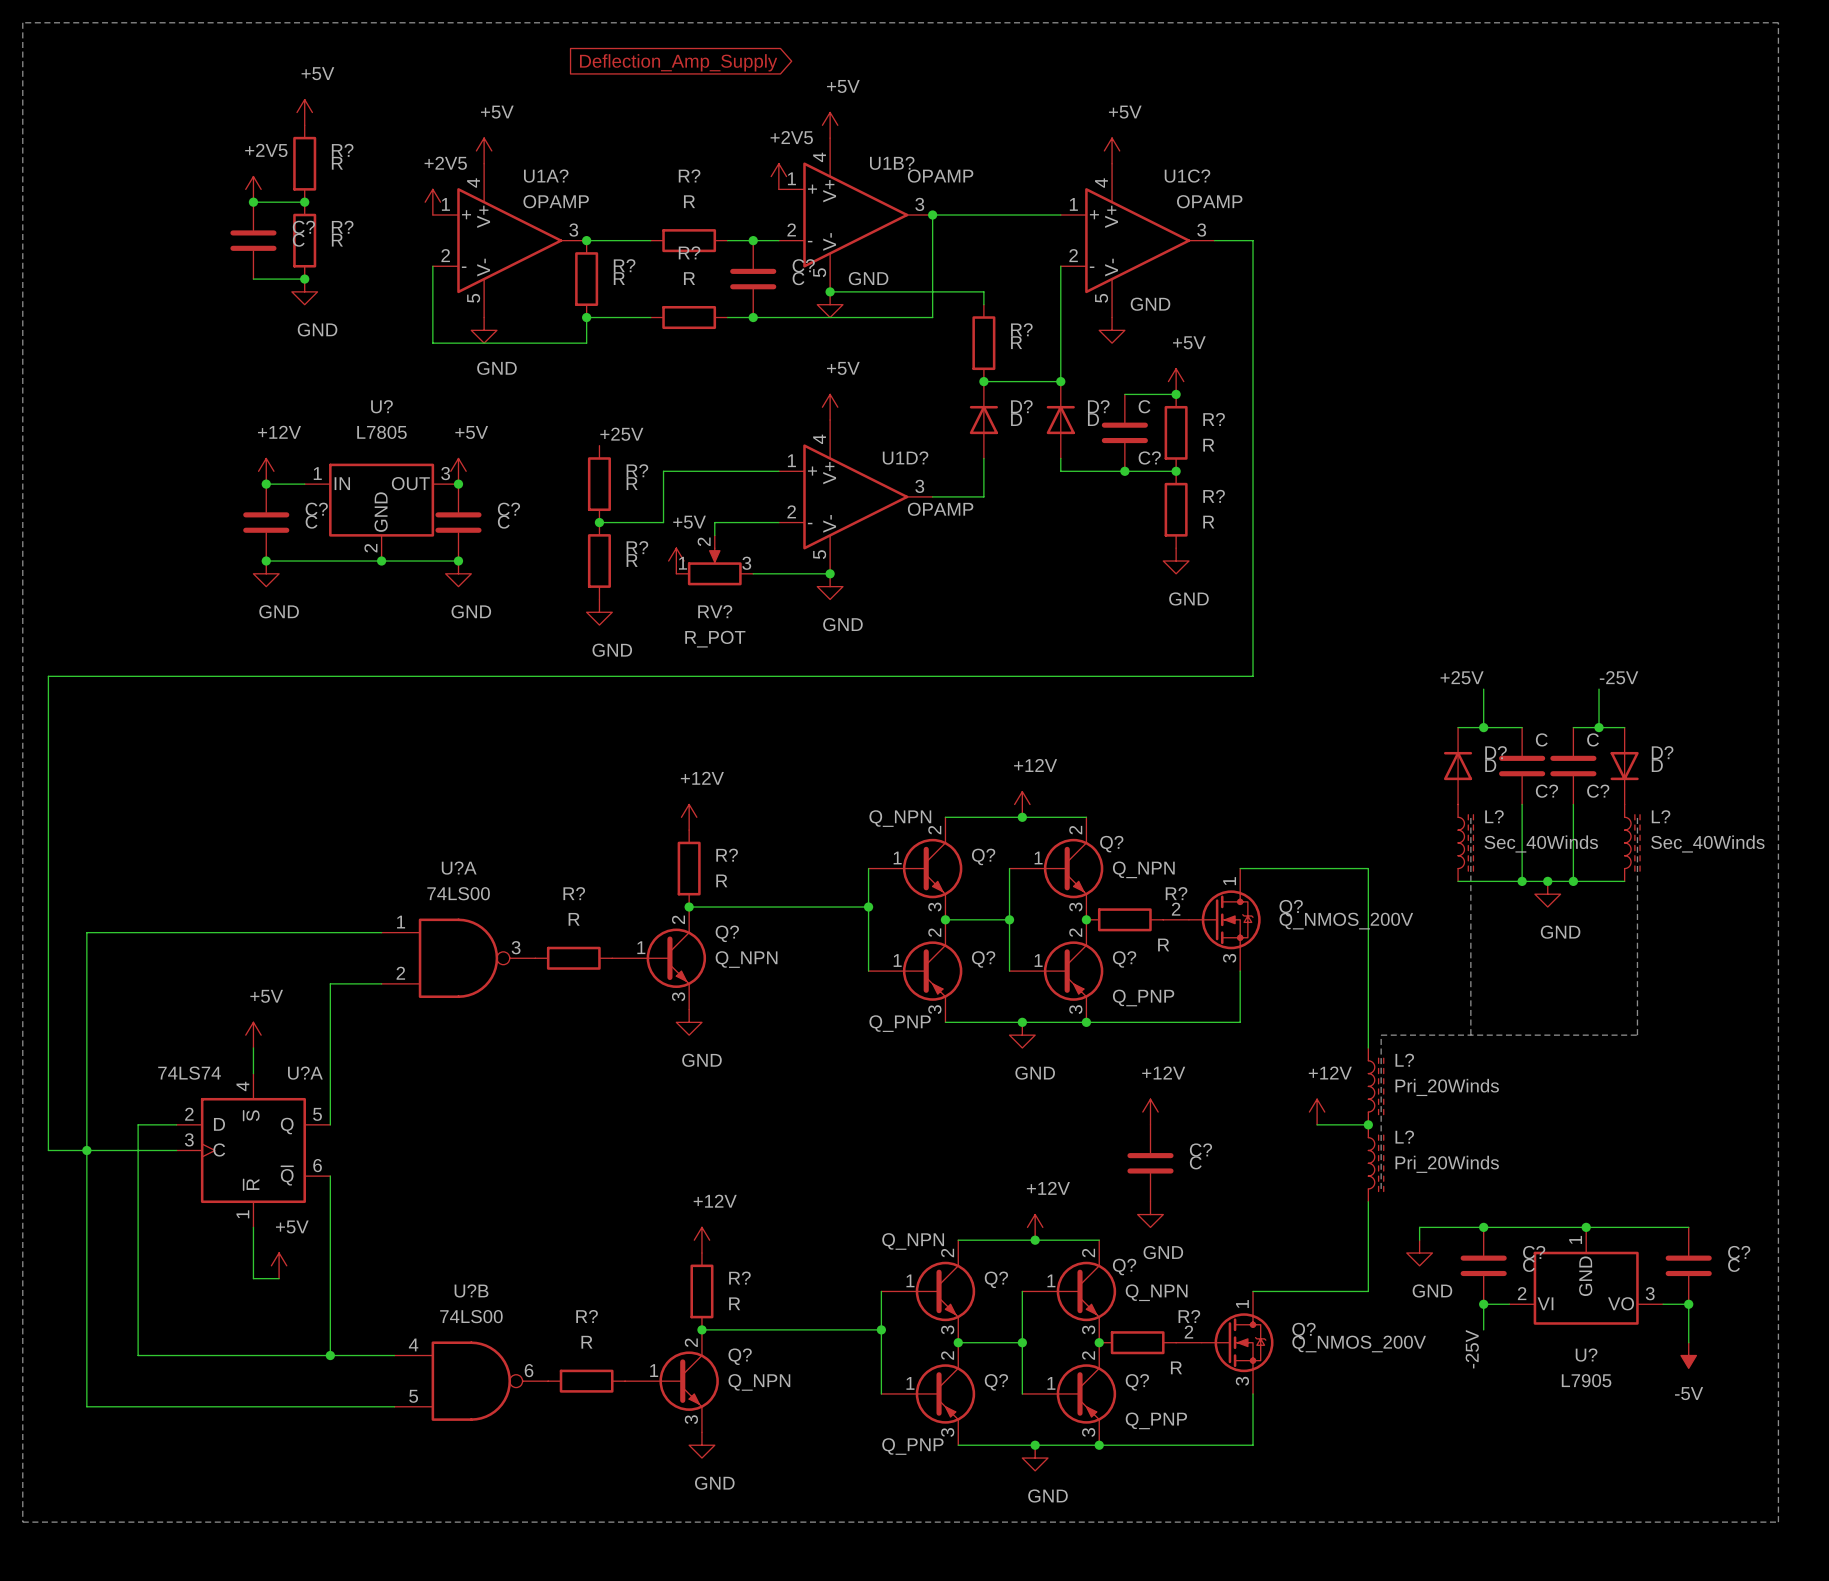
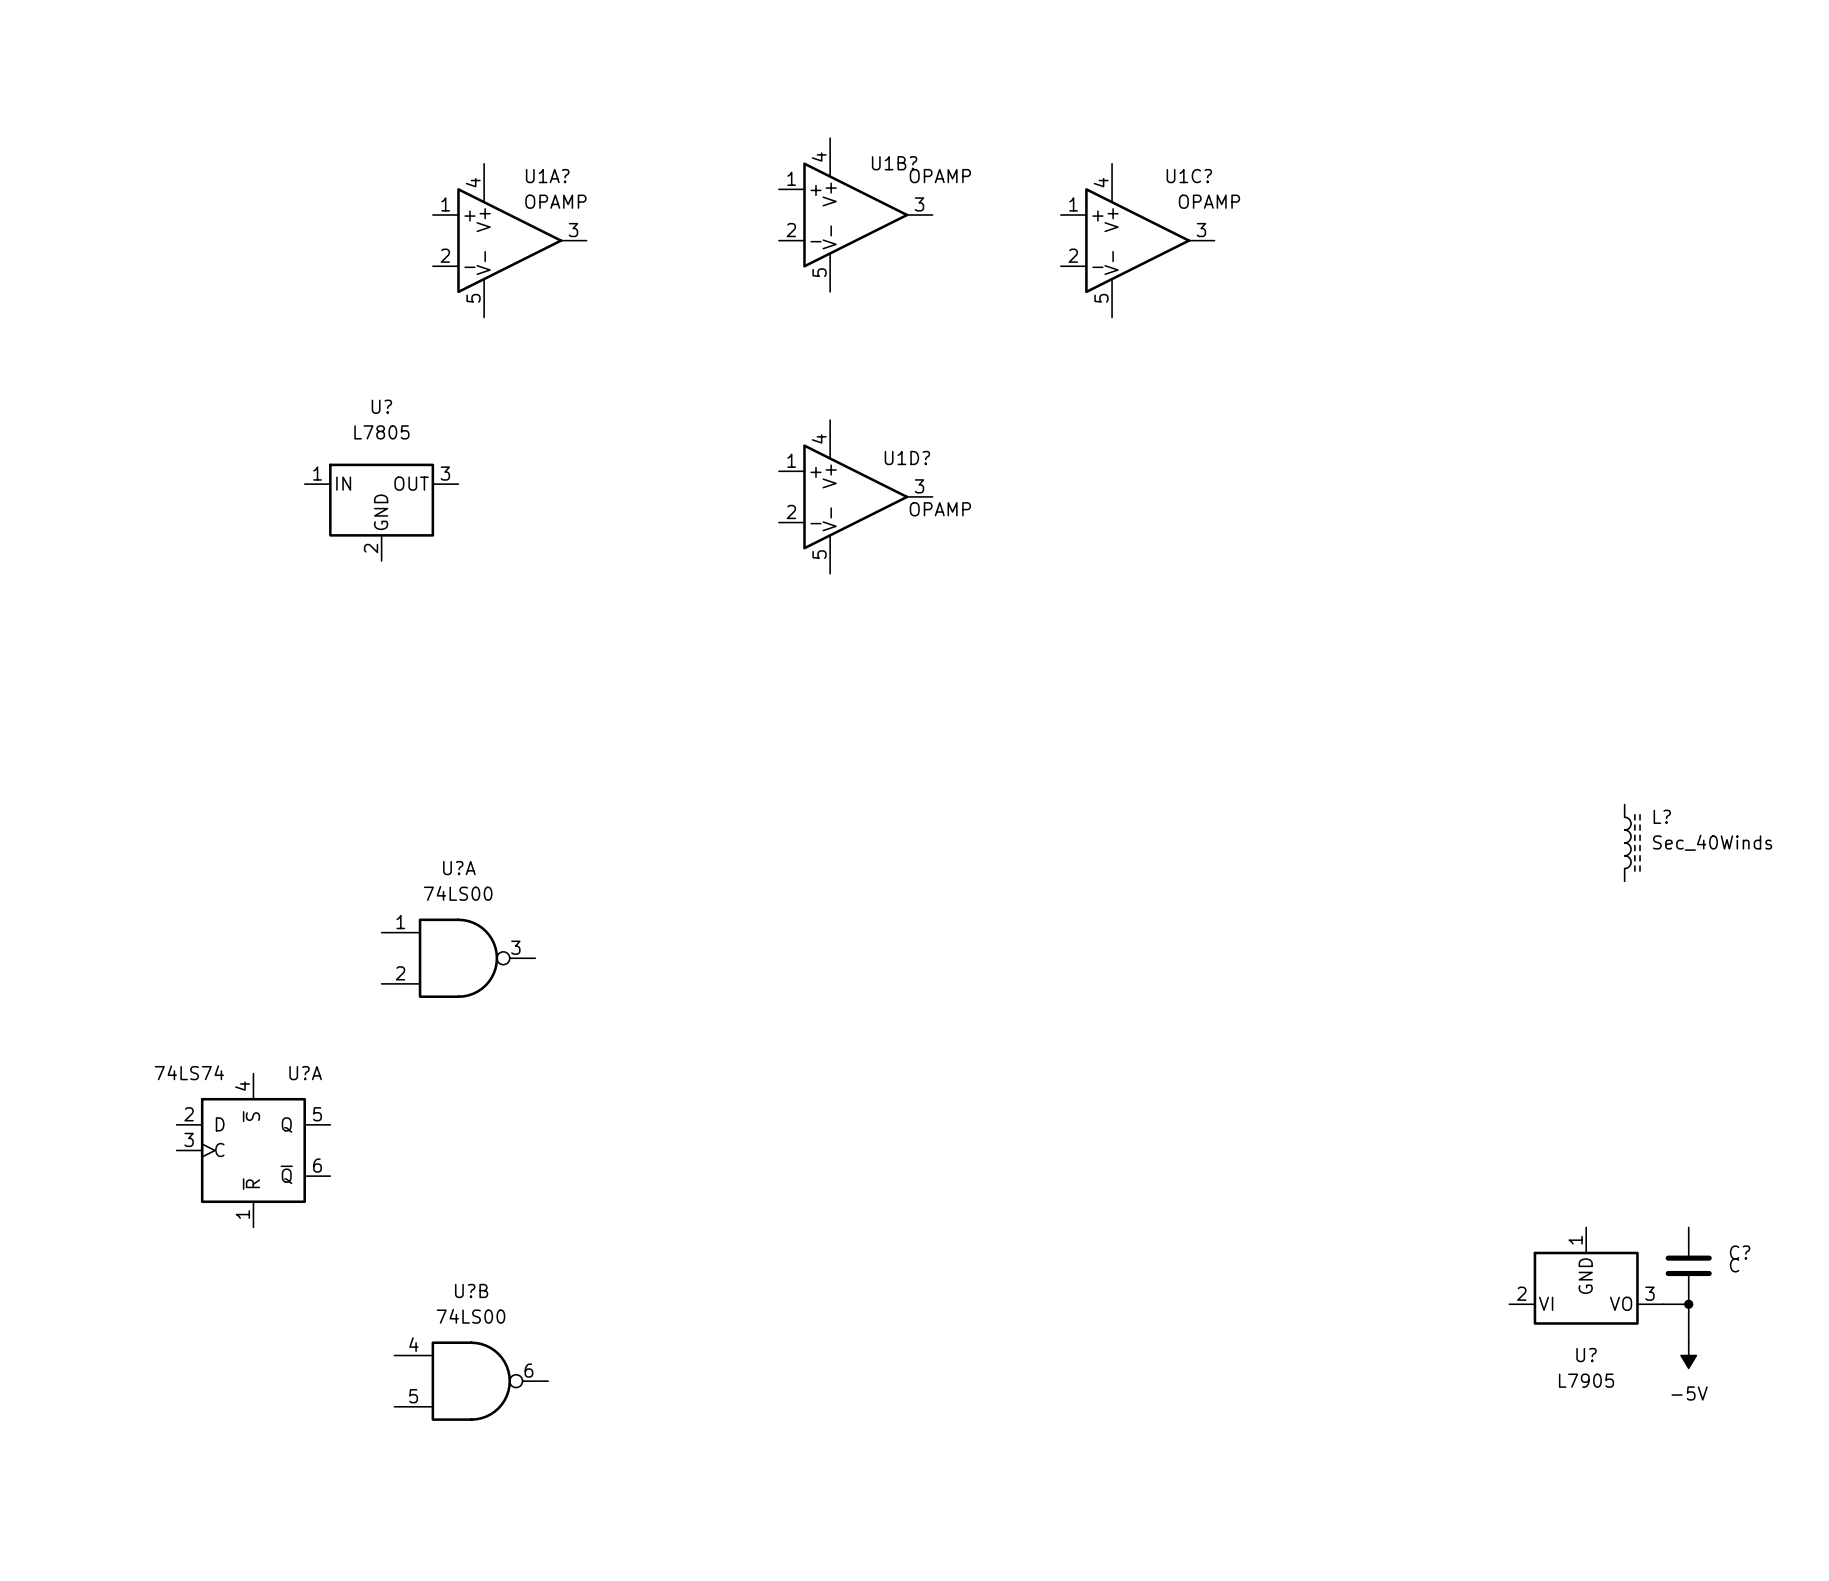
line: (22, 22) (22, 1522) (1778, 1522) (1778, 22) (22, 22) -> none
global label: Deflection_Amp_Supply (678, 62) -> none
power symbol: +5V (304, 112) -> none
power symbol: +5V (830, 125) -> none
power symbol: +5V (484, 150) -> none
power symbol: +5V (1112, 150) -> none
R?: R (304, 163) -> none
power symbol: +2V5 (778, 176) -> none
power symbol: +2V5 (253, 189) -> none
wire: (253, 202) (304, 202) -> none
junction: (253, 202) -> none
junction: (304, 202) -> none
power symbol: +2V5 (432, 202) -> none
junction: (932, 215) -> none
wire: (1060, 215) (932, 215) (932, 317) (727, 317) -> none
C?: C (253, 240) -> none
R?: R (304, 240) -> none
wire: (586, 240) (650, 240) -> none
junction: (586, 240) -> none
R?: R (689, 240) -> none
wire: (727, 240) (778, 240) -> none
junction: (753, 240) -> none
wire: (1214, 240) (1253, 240) (1253, 676) (48, 676) (48, 1150) (176, 1150) -> none
wire: (432, 266) (432, 343) (586, 343) (586, 317) (650, 317) -> none
wire: (1060, 266) (1060, 381) (983, 381) -> none
wire: (253, 279) (304, 279) -> none
junction: (304, 279) -> none
R?: R (586, 279) -> none
C?: C (753, 279) -> none
power symbol: GND (304, 291) -> none
wire: (830, 291) (983, 291) (983, 304) -> none
junction: (830, 291) -> none
power symbol: GND (830, 304) -> none
junction: (586, 317) -> none
R?: R (689, 317) -> none
junction: (753, 317) -> none
power symbol: GND (484, 330) -> none
power symbol: GND (1112, 330) -> none
R?: R (983, 343) -> none
junction: (983, 381) -> none
junction: (1060, 381) -> none
power symbol: +5V (1176, 381) -> none
wire: (1124, 394) (1176, 394) -> none
junction: (1176, 394) -> none
power symbol: +5V (830, 407) -> none
D?: D (983, 420) -> none
D?: D (1060, 420) -> none
C?: C (1124, 432) -> none
R?: R (1176, 432) -> none
label: +25V (621, 434) -> none
wire: (983, 458) (983, 496) (932, 496) -> none
wire: (1060, 458) (1060, 471) (1176, 471) -> none
power symbol: +12V (266, 471) -> none
power symbol: +5V (458, 471) -> none
wire: (778, 471) (663, 471) (663, 522) (599, 522) -> none
junction: (1124, 471) -> none
junction: (1176, 471) -> none
wire: (266, 484) (304, 484) -> none
junction: (266, 484) -> none
junction: (458, 484) -> none
R?: R (599, 484) -> none
R?: R (1176, 509) -> none
C?: C (266, 522) -> none
C?: C (458, 522) -> none
junction: (599, 522) -> none
wire: (778, 522) (714, 522) (714, 535) -> none
RV?: R_POT (714, 560) -> none
wire: (266, 561) (458, 561) -> none
junction: (266, 561) -> none
junction: (381, 561) -> none
junction: (458, 561) -> none
R?: R (599, 561) -> none
power symbol: +5V (676, 561) -> none
power symbol: GND (1176, 561) -> none
power symbol: GND (266, 573) -> none
power symbol: GND (458, 573) -> none
wire: (753, 573) (830, 573) -> none
junction: (830, 573) -> none
power symbol: GND (830, 586) -> none
power symbol: GND (599, 612) -> none
label: +25V (1462, 677) -> none
label: -25V (1619, 677) -> none
wire: (1483, 689) (1483, 727) -> none
wire: (1599, 689) (1599, 727) -> none
wire: (1458, 727) (1522, 727) -> none
junction: (1483, 727) -> none
wire: (1573, 727) (1624, 727) -> none
junction: (1599, 727) -> none
D?: D (1458, 766) -> none
C?: C (1522, 766) -> none
C?: C (1573, 766) -> none
D?: D (1624, 766) -> none
power symbol: +12V (1022, 804) -> none
wire: (1522, 804) (1522, 881) -> none
wire: (1573, 804) (1573, 881) -> none
power symbol: +12V (689, 817) -> none
wire: (945, 817) (1086, 817) -> none
junction: (1022, 817) -> none
line: (1470, 817) (1470, 1035) -> none
line: (1637, 817) (1637, 1035) (1381, 1035) (1381, 1188) -> none
L?: Sec_40Winds (1465, 842) -> none
R?: R (689, 868) -> none
wire: (868, 868) (868, 971) -> none
Q?: Q_NPN (915, 868) -> none
wire: (1009, 868) (1009, 971) -> none
Q?: Q_NPN (1056, 868) -> none
wire: (1240, 868) (1368, 868) (1368, 1047) -> none
wire: (1458, 881) (1624, 881) -> none
junction: (1522, 881) -> none
junction: (1547, 881) -> none
junction: (1573, 881) -> none
power symbol: GND (1547, 894) -> none
wire: (689, 907) (868, 907) -> none
junction: (689, 907) -> none
junction: (868, 907) -> none
wire: (945, 919) (1009, 919) -> none
junction: (945, 919) -> none
junction: (1009, 919) -> none
junction: (1086, 919) -> none
R?: R (1124, 919) -> none
Q?: Q_NMOS_200V (1212, 919) -> none
wire: (381, 932) (86, 932) (86, 1406) (394, 1406) -> none
R?: R (573, 958) -> none
Q?: Q_NPN (659, 958) -> none
Q?: Q_PNP (915, 971) -> none
Q?: Q_PNP (1056, 971) -> none
wire: (1240, 971) (1240, 1022) (945, 1022) -> none
wire: (381, 983) (330, 983) (330, 1124) -> none
power symbol: GND (689, 1022) -> none
junction: (1022, 1022) -> none
junction: (1086, 1022) -> none
power symbol: +5V (253, 1035) -> none
power symbol: GND (1022, 1035) -> none
wire: (253, 1047) (253, 1073) -> none
L?: Pri_20Winds (1376, 1086) -> none
power symbol: +12V (1150, 1112) -> none
power symbol: +12V (1317, 1112) -> none
wire: (176, 1124) (138, 1124) (138, 1355) (394, 1355) -> none
wire: (1317, 1124) (1368, 1124) -> none
junction: (1368, 1124) -> none
junction: (86, 1150) -> none
C?: C (1150, 1163) -> none
L?: Pri_20Winds (1376, 1163) -> none
wire: (330, 1176) (330, 1355) -> none
wire: (1368, 1201) (1368, 1291) (1253, 1291) -> none
power symbol: GND (1150, 1214) -> none
wire: (253, 1227) (253, 1278) (279, 1278) -> none
power symbol: +12V (1035, 1227) -> none
junction: (1483, 1227) -> none
junction: (1586, 1227) -> none
wire: (1688, 1227) (1419, 1227) (1419, 1240) -> none
power symbol: +12V (701, 1240) -> none
wire: (958, 1240) (1099, 1240) -> none
junction: (1035, 1240) -> none
power symbol: GND (1419, 1253) -> none
power symbol: +5V (279, 1265) -> none
C?: C (1483, 1265) -> none
R?: R (701, 1291) -> none
wire: (881, 1291) (881, 1393) -> none
Q?: Q_NPN (928, 1291) -> none
wire: (1022, 1291) (1022, 1393) -> none
Q?: Q_NPN (1069, 1291) -> none
junction: (1483, 1304) -> none
wire: (1509, 1304) (1483, 1304) (1483, 1329) -> none
wire: (701, 1329) (881, 1329) -> none
junction: (701, 1329) -> none
junction: (881, 1329) -> none
wire: (958, 1342) (1022, 1342) -> none
junction: (958, 1342) -> none
junction: (1022, 1342) -> none
junction: (1099, 1342) -> none
R?: R (1137, 1342) -> none
Q?: Q_NMOS_200V (1224, 1342) -> none
label: -25V (1472, 1349) -> none
junction: (330, 1355) -> none
R?: R (586, 1381) -> none
Q?: Q_NPN (671, 1381) -> none
Q?: Q_PNP (928, 1393) -> none
Q?: Q_PNP (1069, 1393) -> none
wire: (1253, 1393) (1253, 1445) (958, 1445) -> none
power symbol: GND (701, 1445) -> none
junction: (1035, 1445) -> none
junction: (1099, 1445) -> none
power symbol: GND (1035, 1458) -> none

